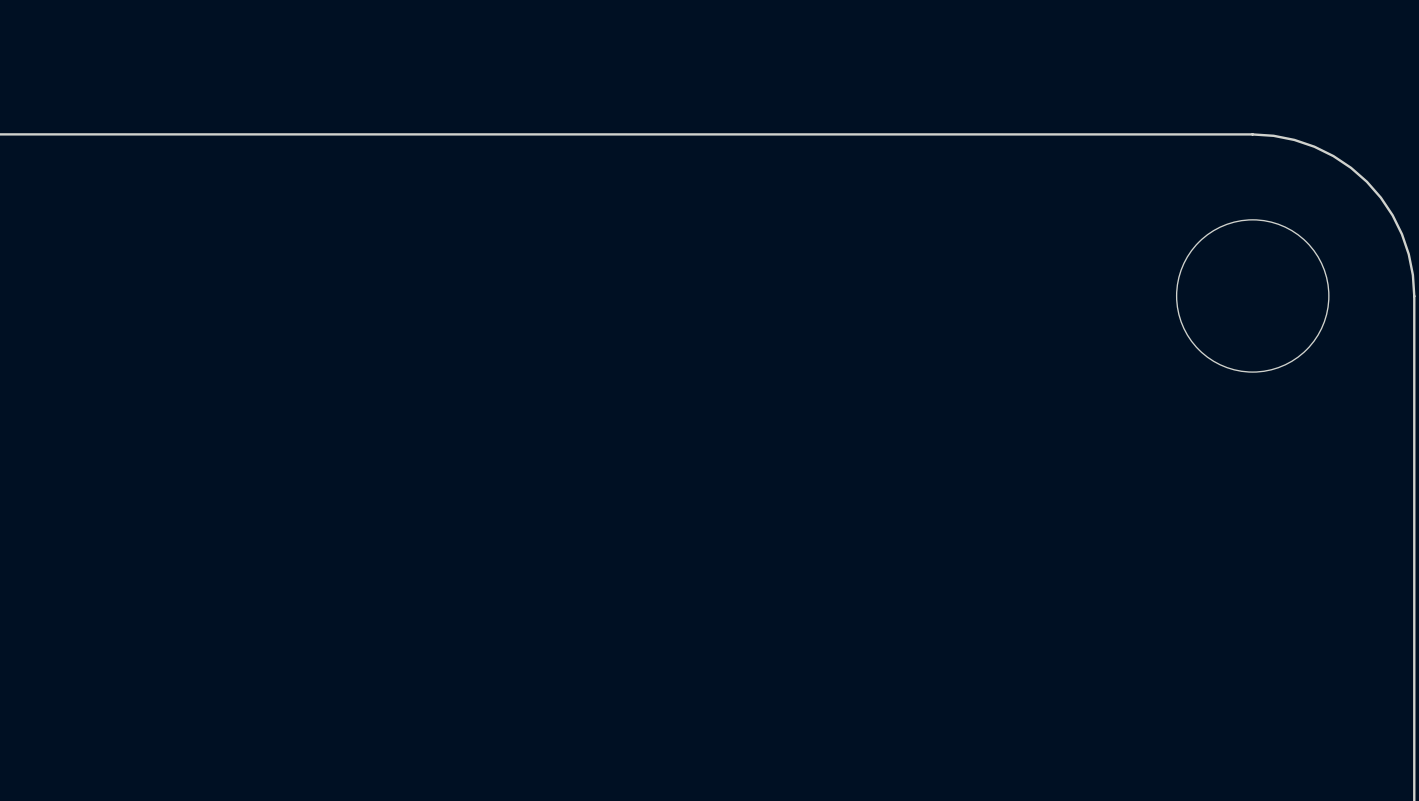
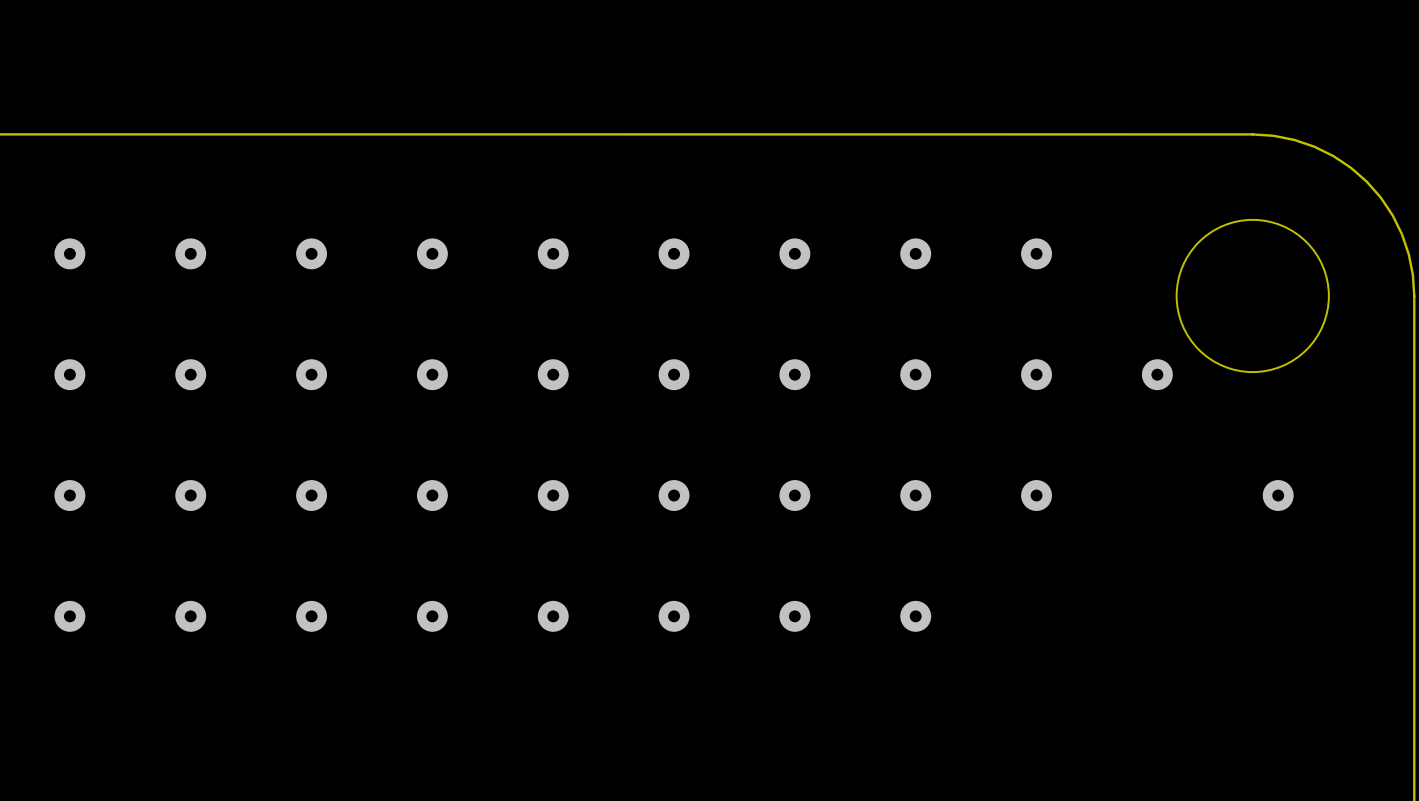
via: none -> (69, 253)
via: none -> (190, 253)
via: none -> (311, 253)
via: none -> (432, 253)
via: none -> (553, 253)
via: none -> (674, 253)
via: none -> (794, 253)
via: none -> (915, 253)
via: none -> (1036, 253)
via: none -> (69, 374)
via: none -> (190, 374)
via: none -> (311, 374)
via: none -> (432, 374)
via: none -> (553, 374)
via: none -> (674, 374)
via: none -> (794, 374)
via: none -> (915, 374)
via: none -> (1036, 374)
via: none -> (1157, 374)
via: none -> (69, 495)
via: none -> (190, 495)
via: none -> (311, 495)
via: none -> (432, 495)
via: none -> (553, 495)
via: none -> (674, 495)
via: none -> (794, 495)
via: none -> (915, 495)
via: none -> (1036, 495)
via: none -> (1278, 495)
via: none -> (69, 616)
via: none -> (190, 616)
via: none -> (311, 616)
via: none -> (432, 616)
via: none -> (553, 616)
via: none -> (674, 616)
via: none -> (794, 616)
via: none -> (915, 616)

